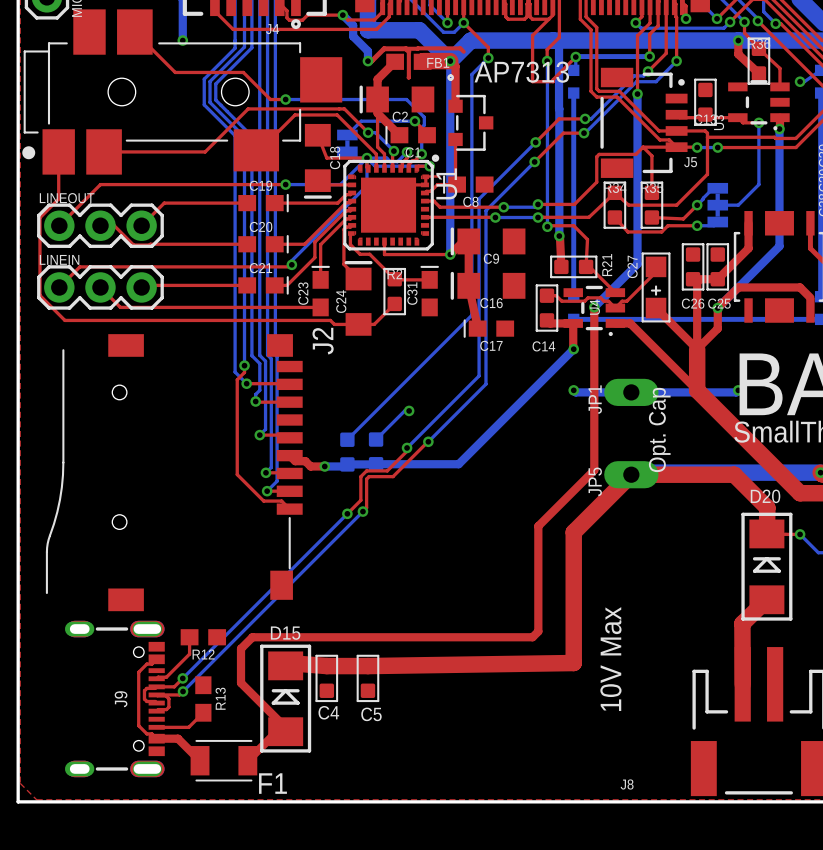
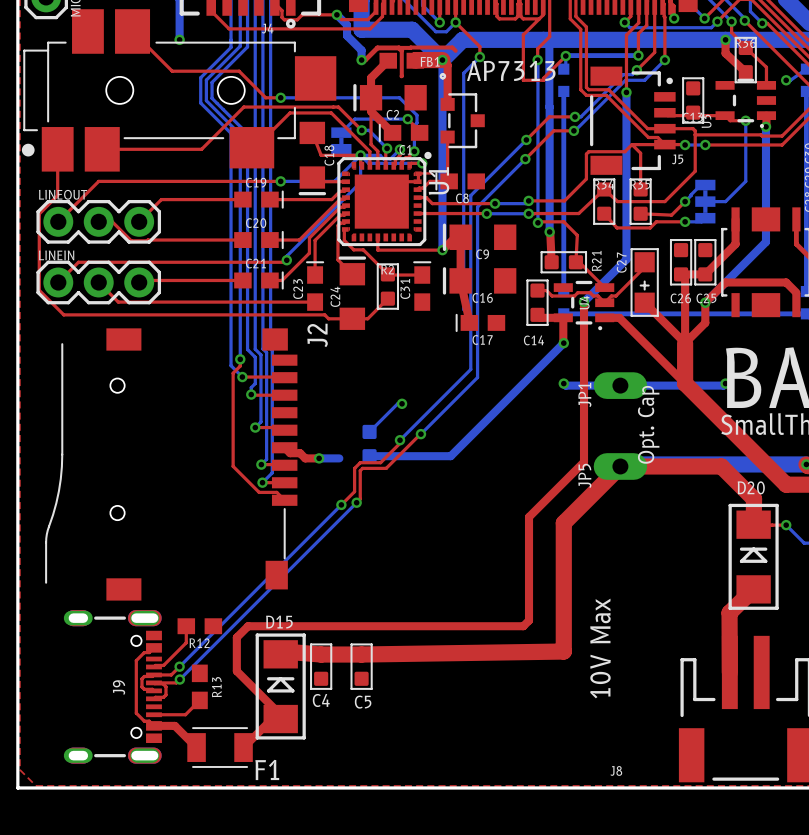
bottom track: (471, 315) (347, 439) -> none
part: (347, 452) -> none
bottom track: (375, 464) (347, 464) (345, 466) -> none

